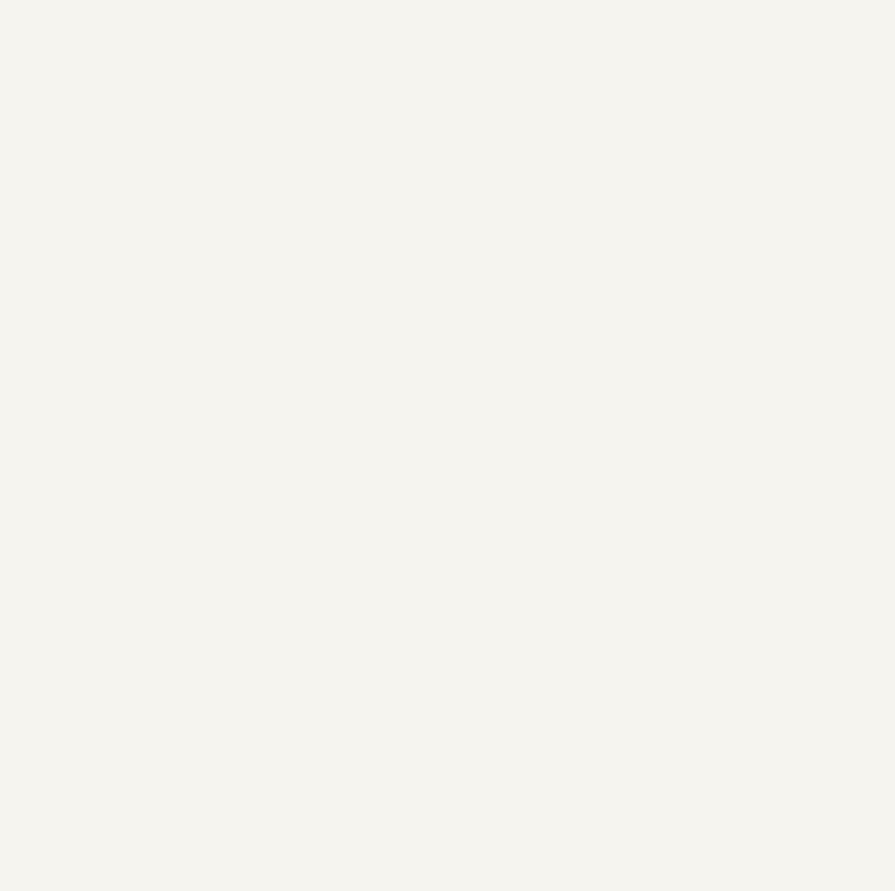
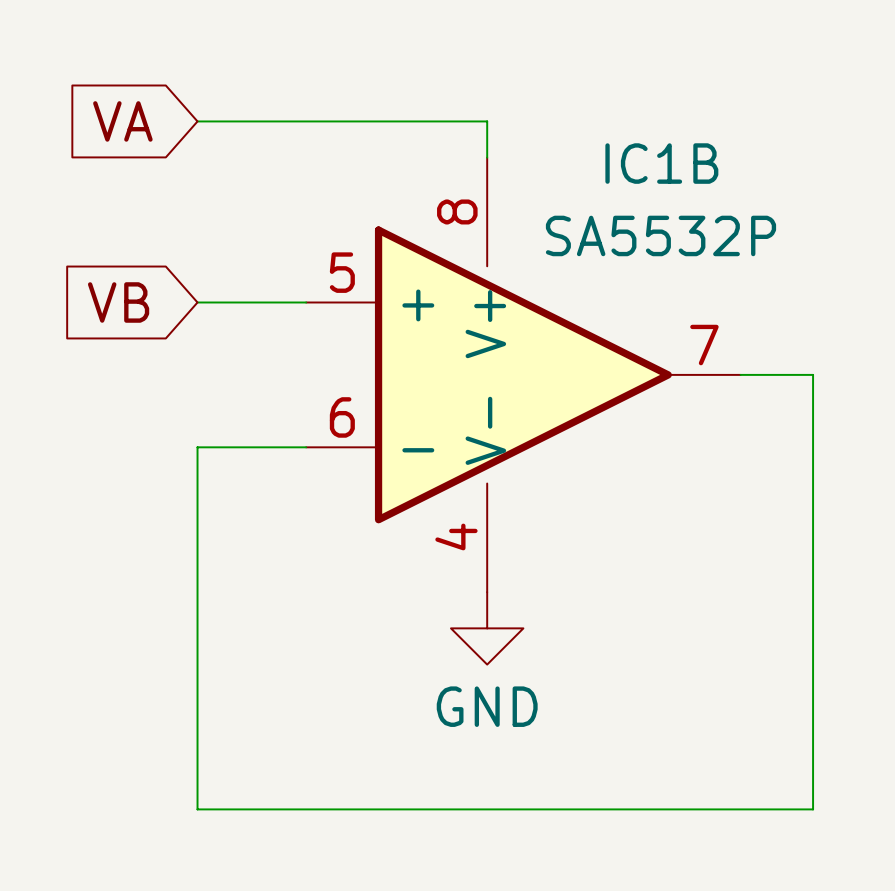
global label: none -> VA (122, 121)
wire: none -> (197, 121) (487, 121) (487, 157)
global label: none -> VB (118, 302)
wire: none -> (197, 302) (306, 302)
part: none -> (487, 374)
IC1B: none -> SA5532P (523, 374)
wire: none -> (740, 374) (813, 374) (813, 809) (197, 809) (197, 447) (306, 447)
power symbol: none -> GND (487, 628)

